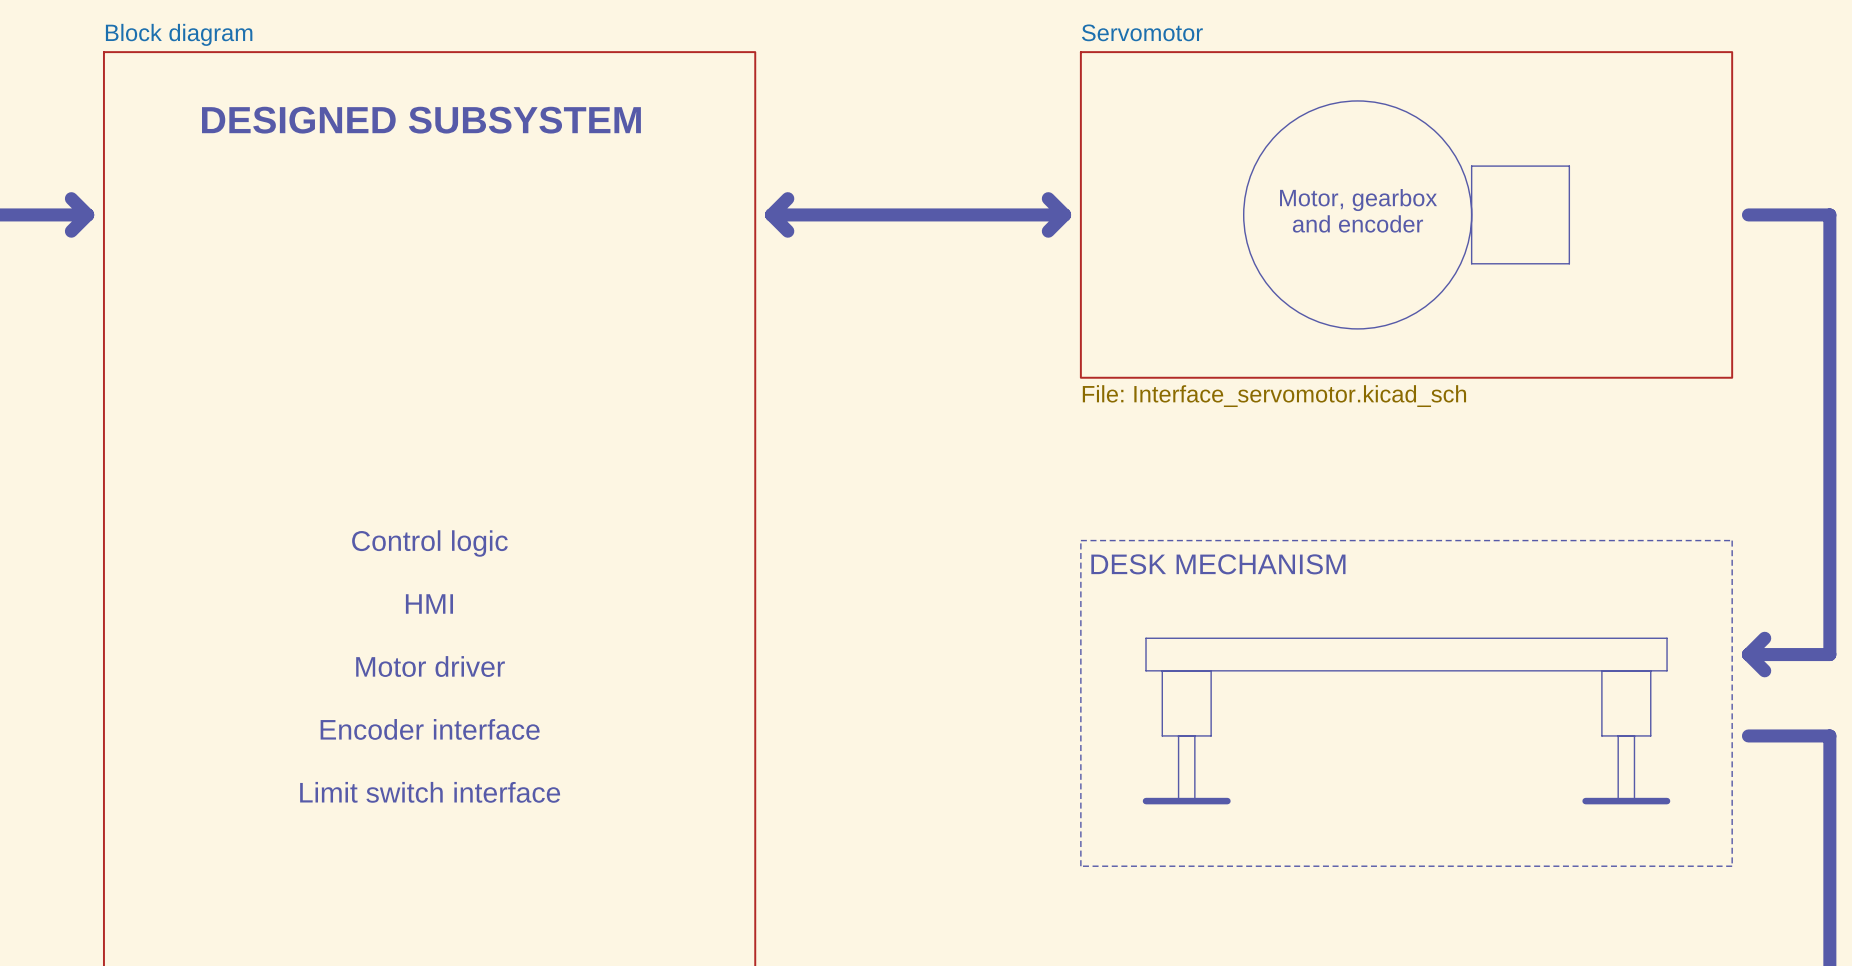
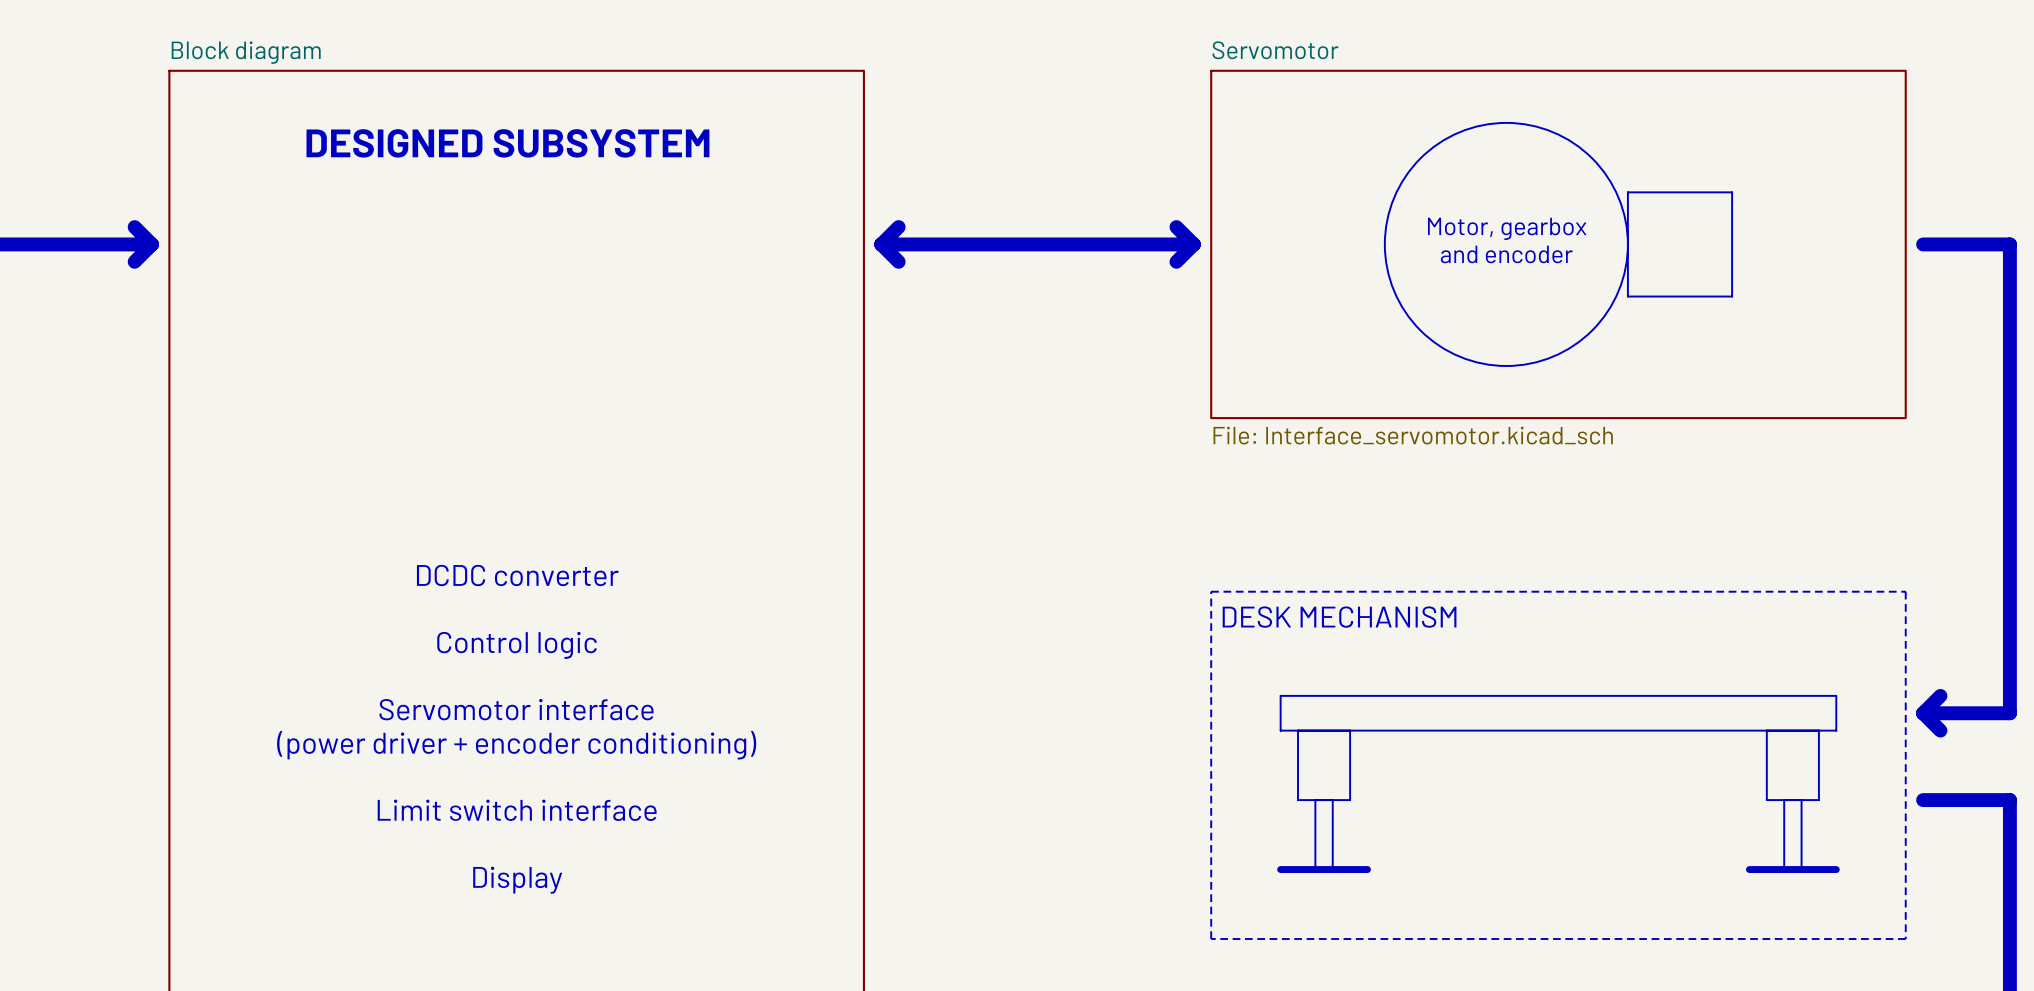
text: none -> DCDC converter (517, 575)
text position: Control logic (429, 543) -> Control logic (517, 645)
text: HMI (429, 603) -> none
text: none -> Servomotor interface (516, 709)
text: Motor driver (430, 666) -> none
text: none -> (power driver + encoder conditioning) (516, 745)
text: Encoder interface (430, 729) -> none
text position: Limit switch interface (430, 792) -> Limit switch interface (517, 810)
text: none -> Display (517, 880)

